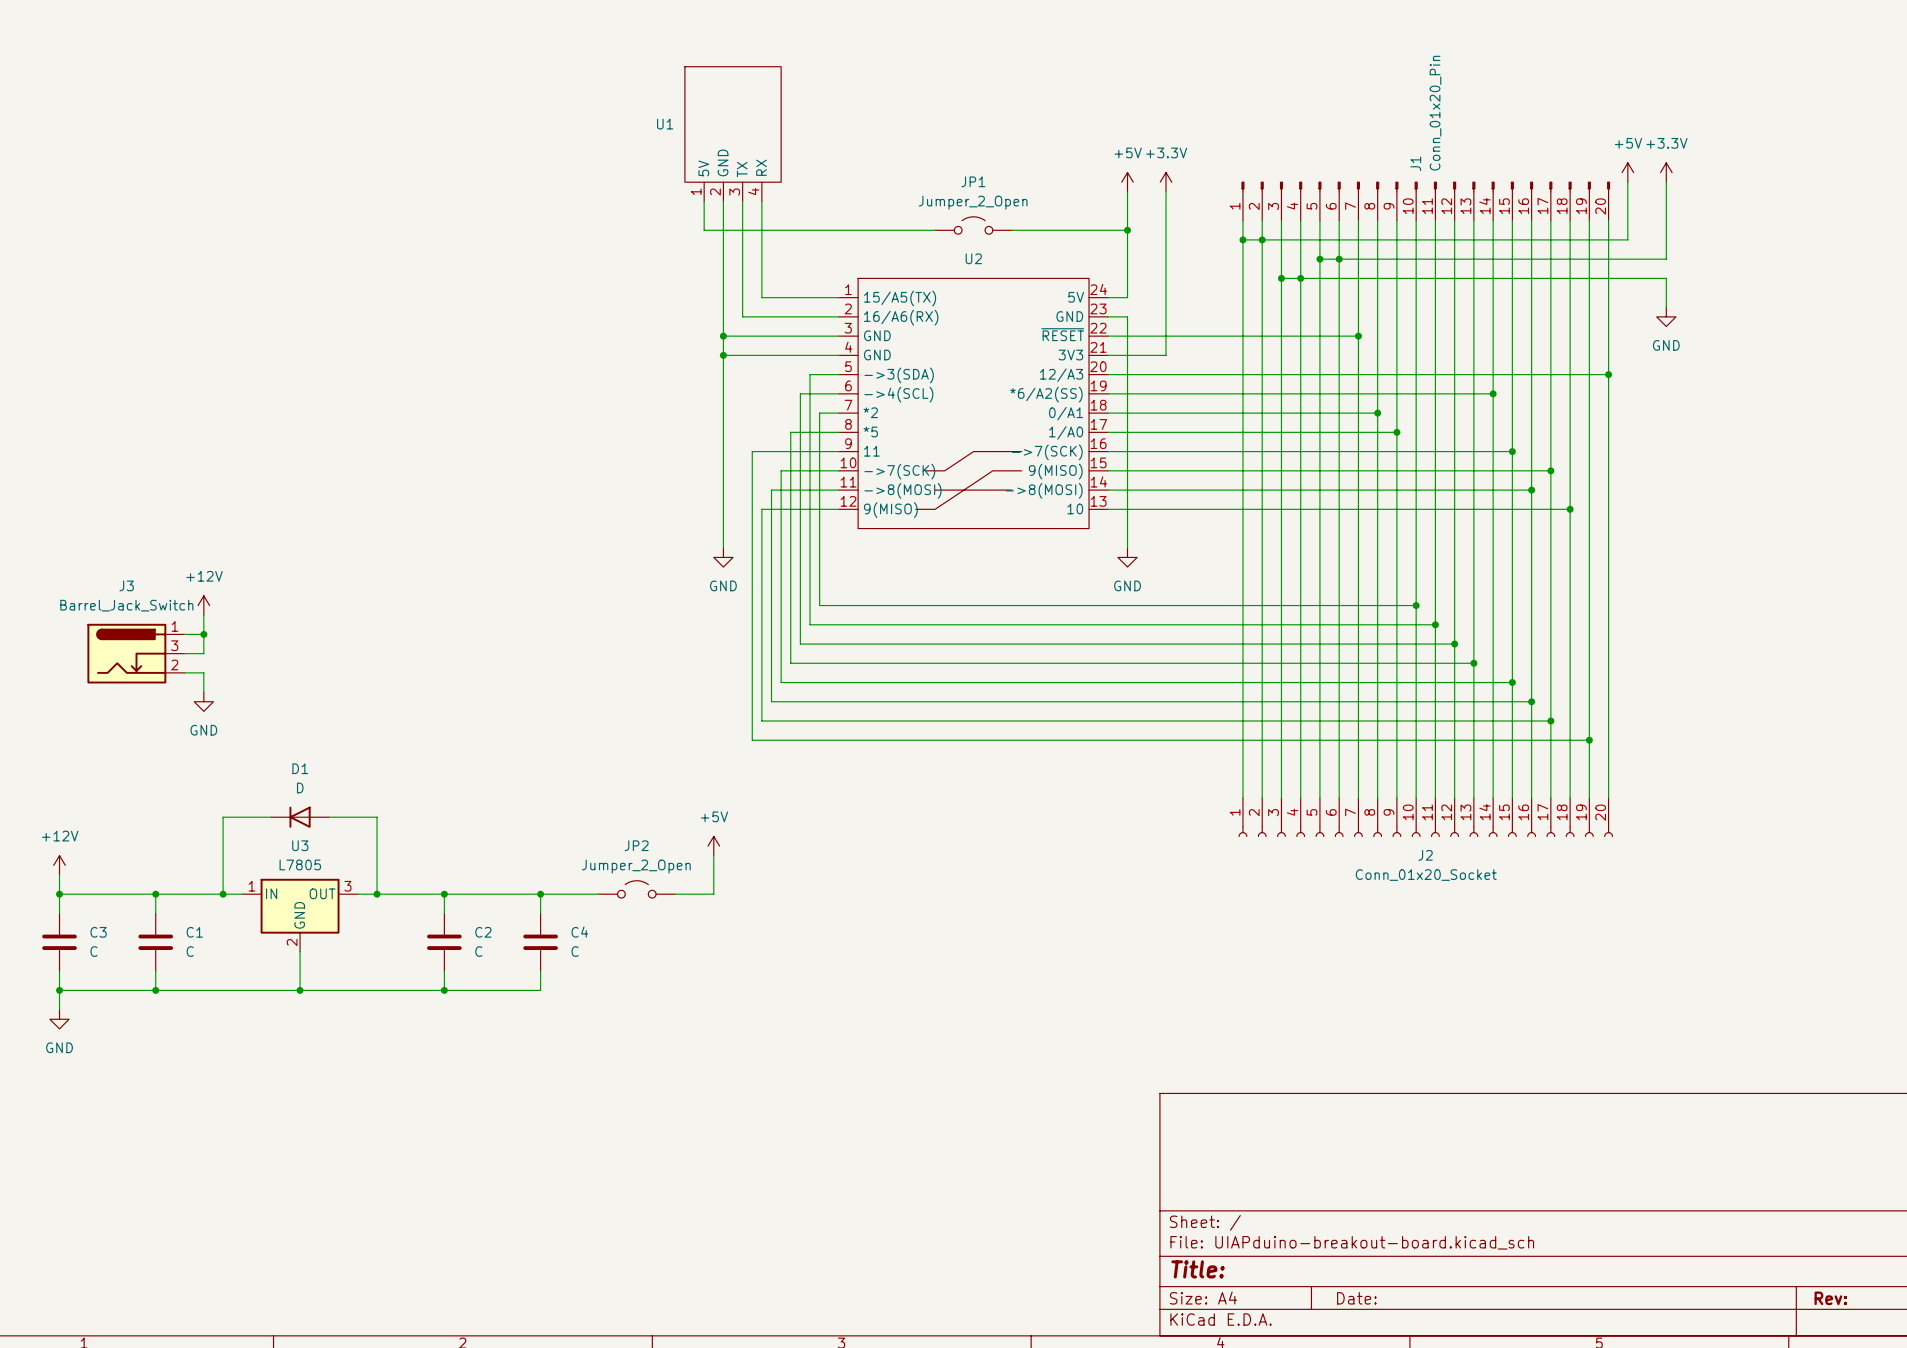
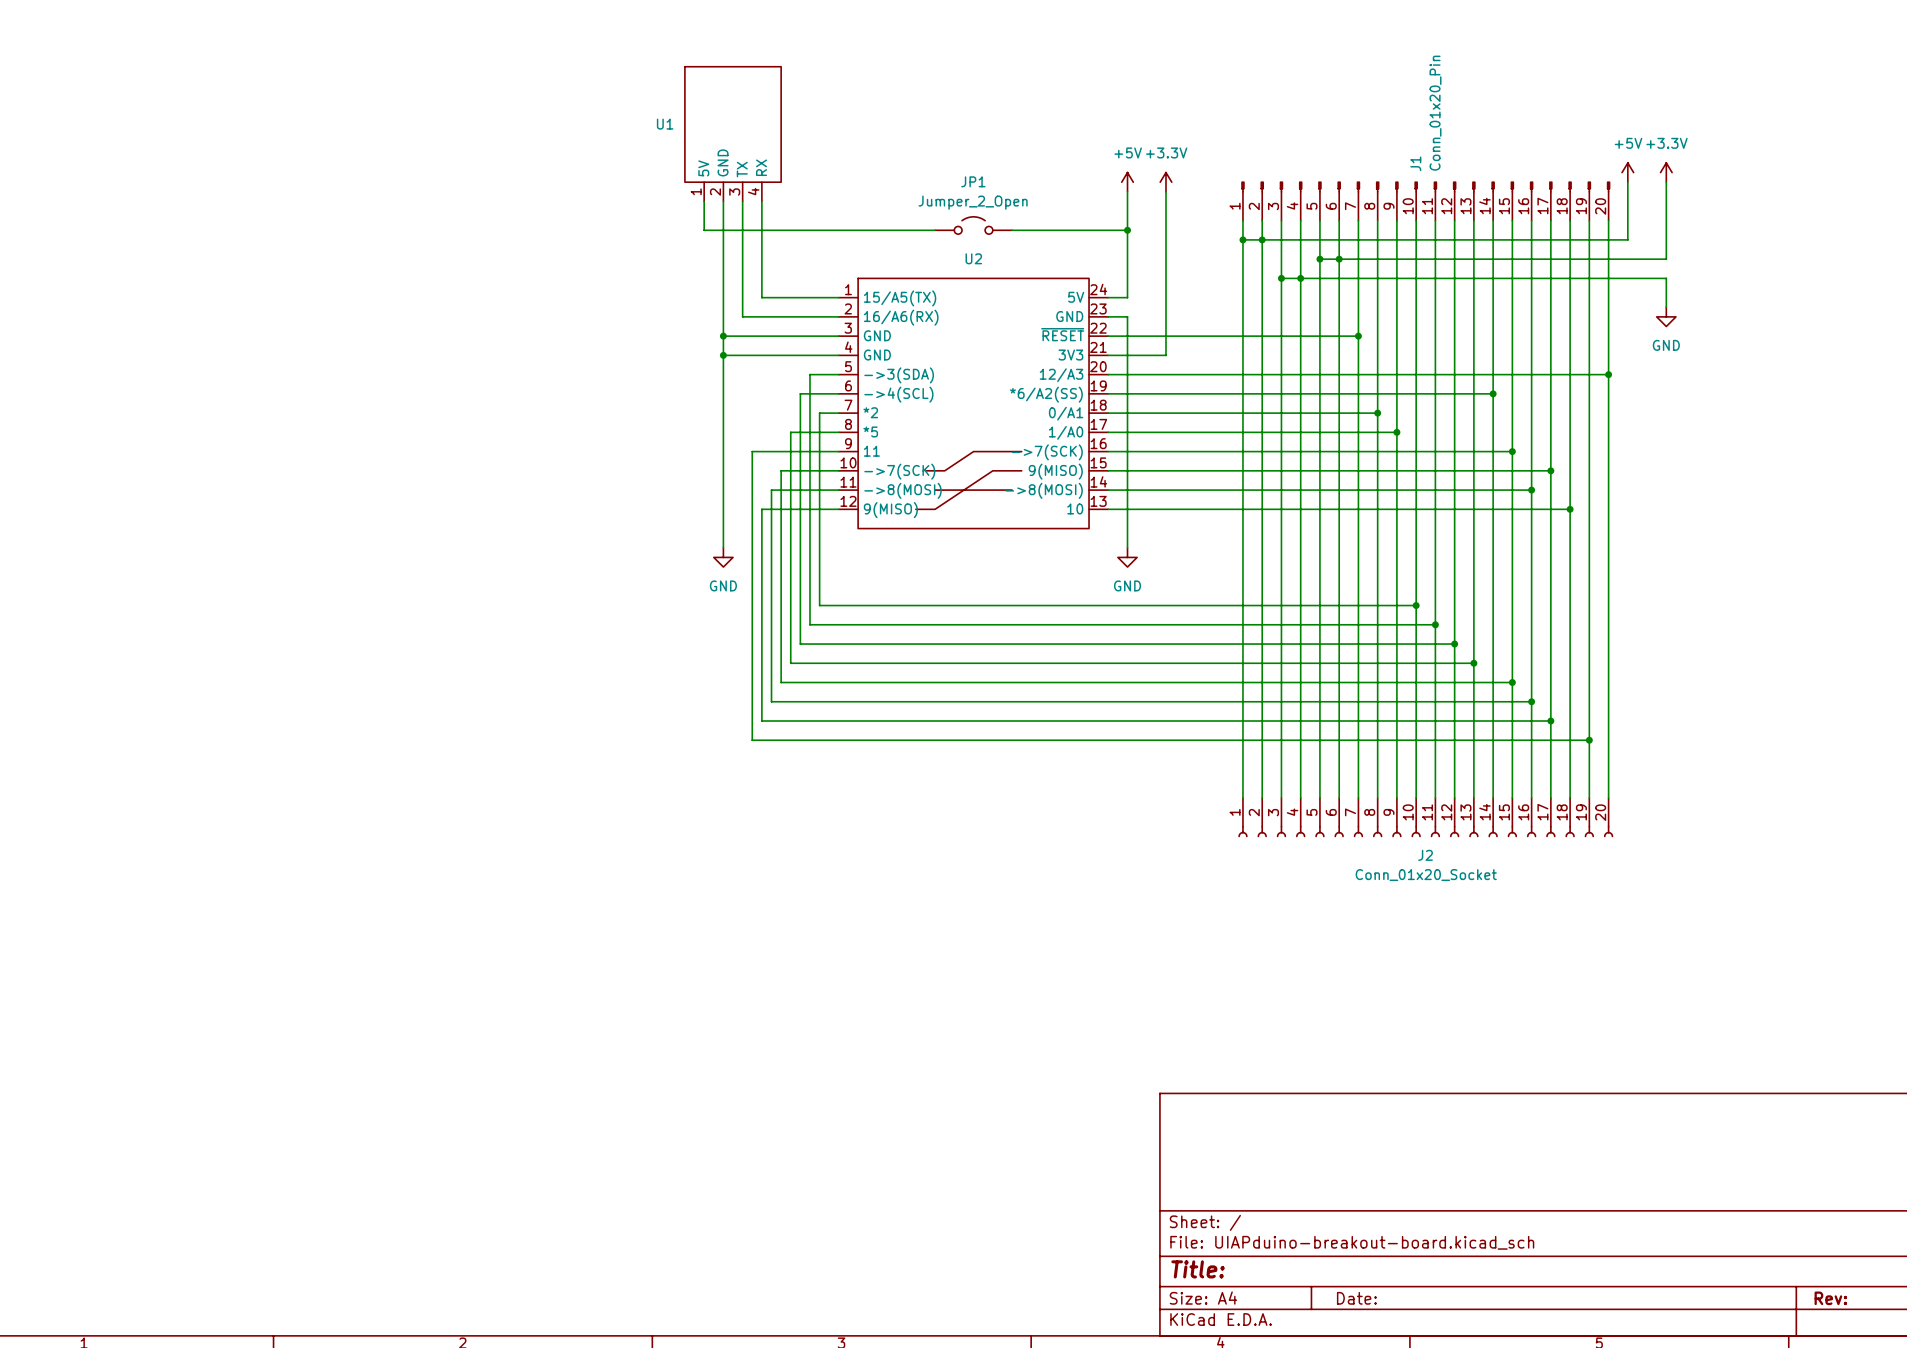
power symbol: +12V (203, 605) -> none
wire: (203, 615) (203, 653) (184, 653) -> none
wire: (184, 634) (203, 634) -> none
junction: (203, 634) -> none
J3: Barrel_Jack_Switch (136, 653) -> none
wire: (184, 672) (203, 672) (203, 692) -> none
power symbol: GND (203, 701) -> none
wire: (271, 817) (223, 817) (223, 894) -> none
D1: D (300, 817) -> none
wire: (328, 817) (377, 817) (377, 894) -> none
power symbol: +5V (713, 846) -> none
wire: (713, 855) (713, 894) (675, 894) -> none
power symbol: +12V (59, 865) -> none
wire: (59, 874) (59, 913) -> none
JP2: Jumper_2_Open (636, 889) -> none
wire: (59, 894) (242, 894) -> none
junction: (59, 894) -> none
wire: (155, 894) (155, 913) -> none
junction: (155, 894) -> none
junction: (223, 894) -> none
wire: (357, 894) (598, 894) -> none
junction: (377, 894) -> none
wire: (444, 894) (444, 913) -> none
junction: (444, 894) -> none
wire: (540, 894) (540, 913) -> none
junction: (540, 894) -> none
U3: L7805 (300, 915) -> none
C3: C (59, 942) -> none
C1: C (155, 942) -> none
C2: C (444, 942) -> none
C4: C (540, 942) -> none
wire: (300, 951) (300, 990) -> none
wire: (59, 971) (59, 1009) -> none
wire: (155, 971) (155, 990) -> none
wire: (444, 971) (444, 990) -> none
wire: (540, 971) (540, 990) (59, 990) -> none
junction: (59, 990) -> none
junction: (155, 990) -> none
junction: (300, 990) -> none
junction: (444, 990) -> none
power symbol: GND (59, 1019) -> none

